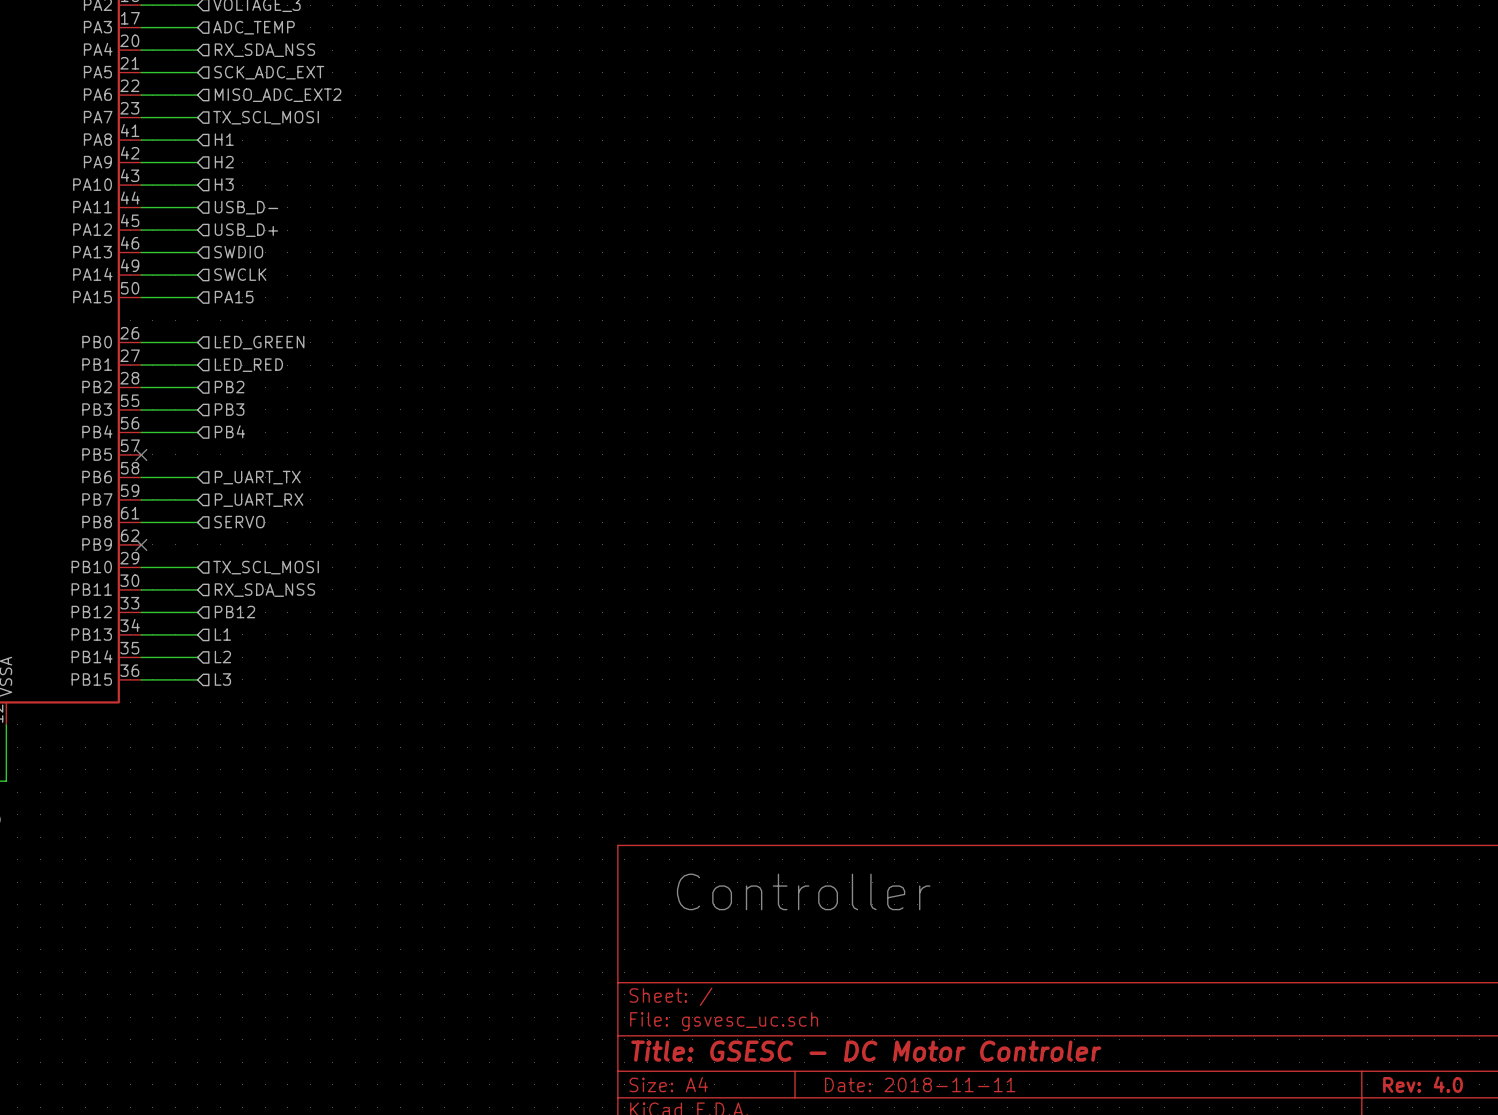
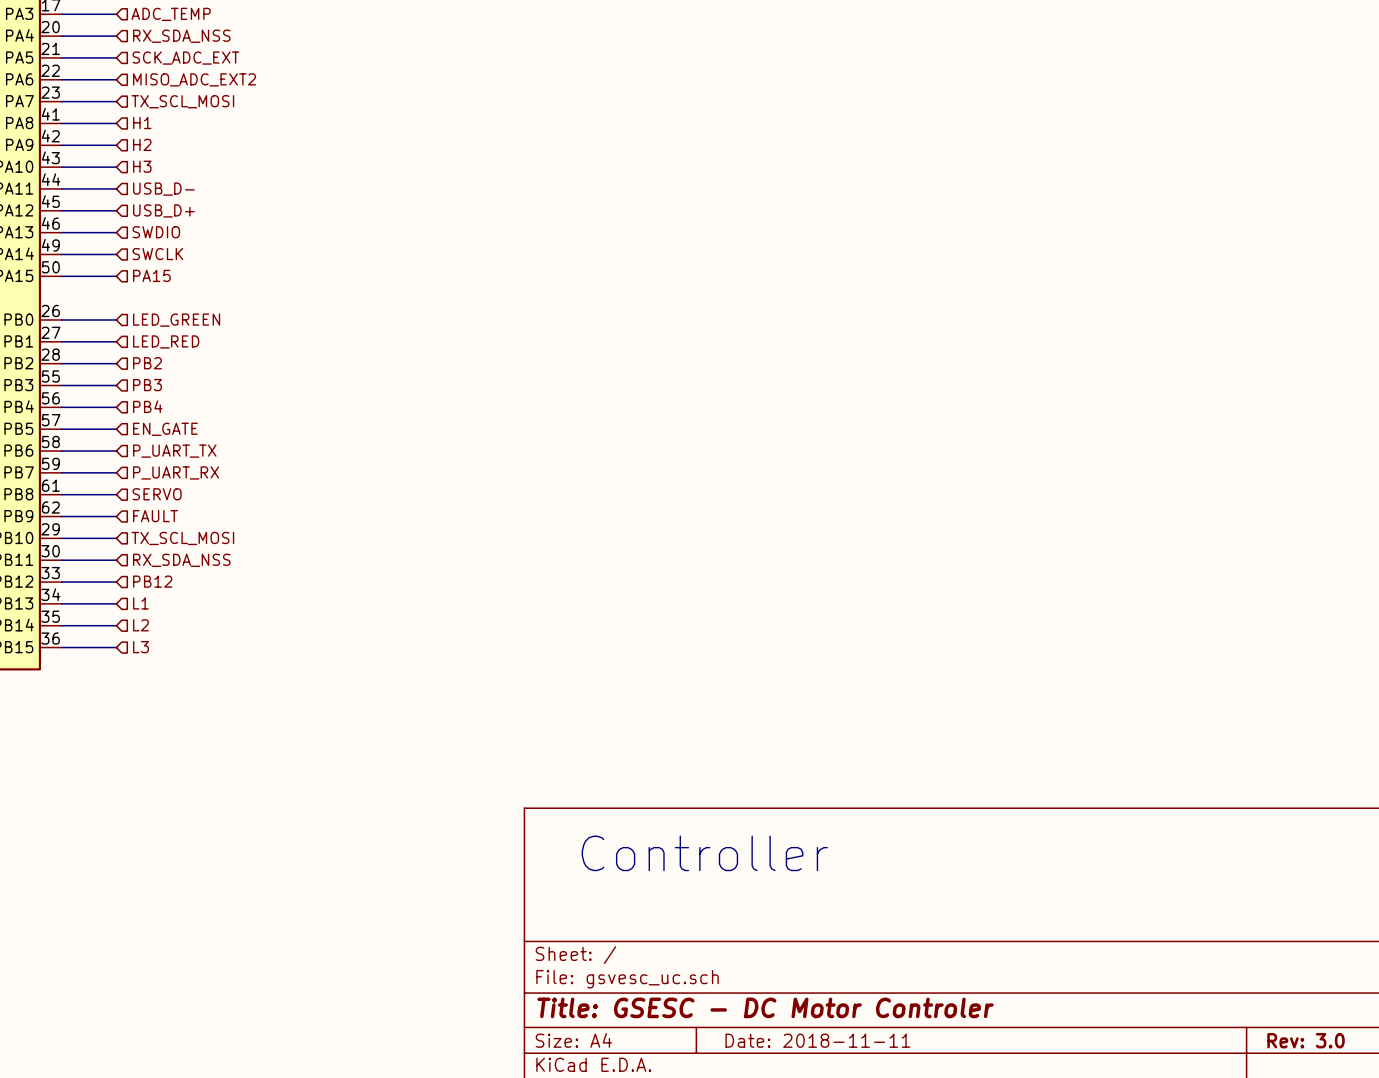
wire: none -> (61, 429) (116, 429)
no-connect mark: (141, 454) -> none
hierarchical label: none -> EN_GATE (165, 429)
wire: none -> (61, 516) (116, 516)
no-connect mark: (141, 544) -> none
hierarchical label: none -> FAULT (155, 516)
title block: Rev: 4.0 (1423, 1084) -> Rev: 3.0 (1306, 1040)

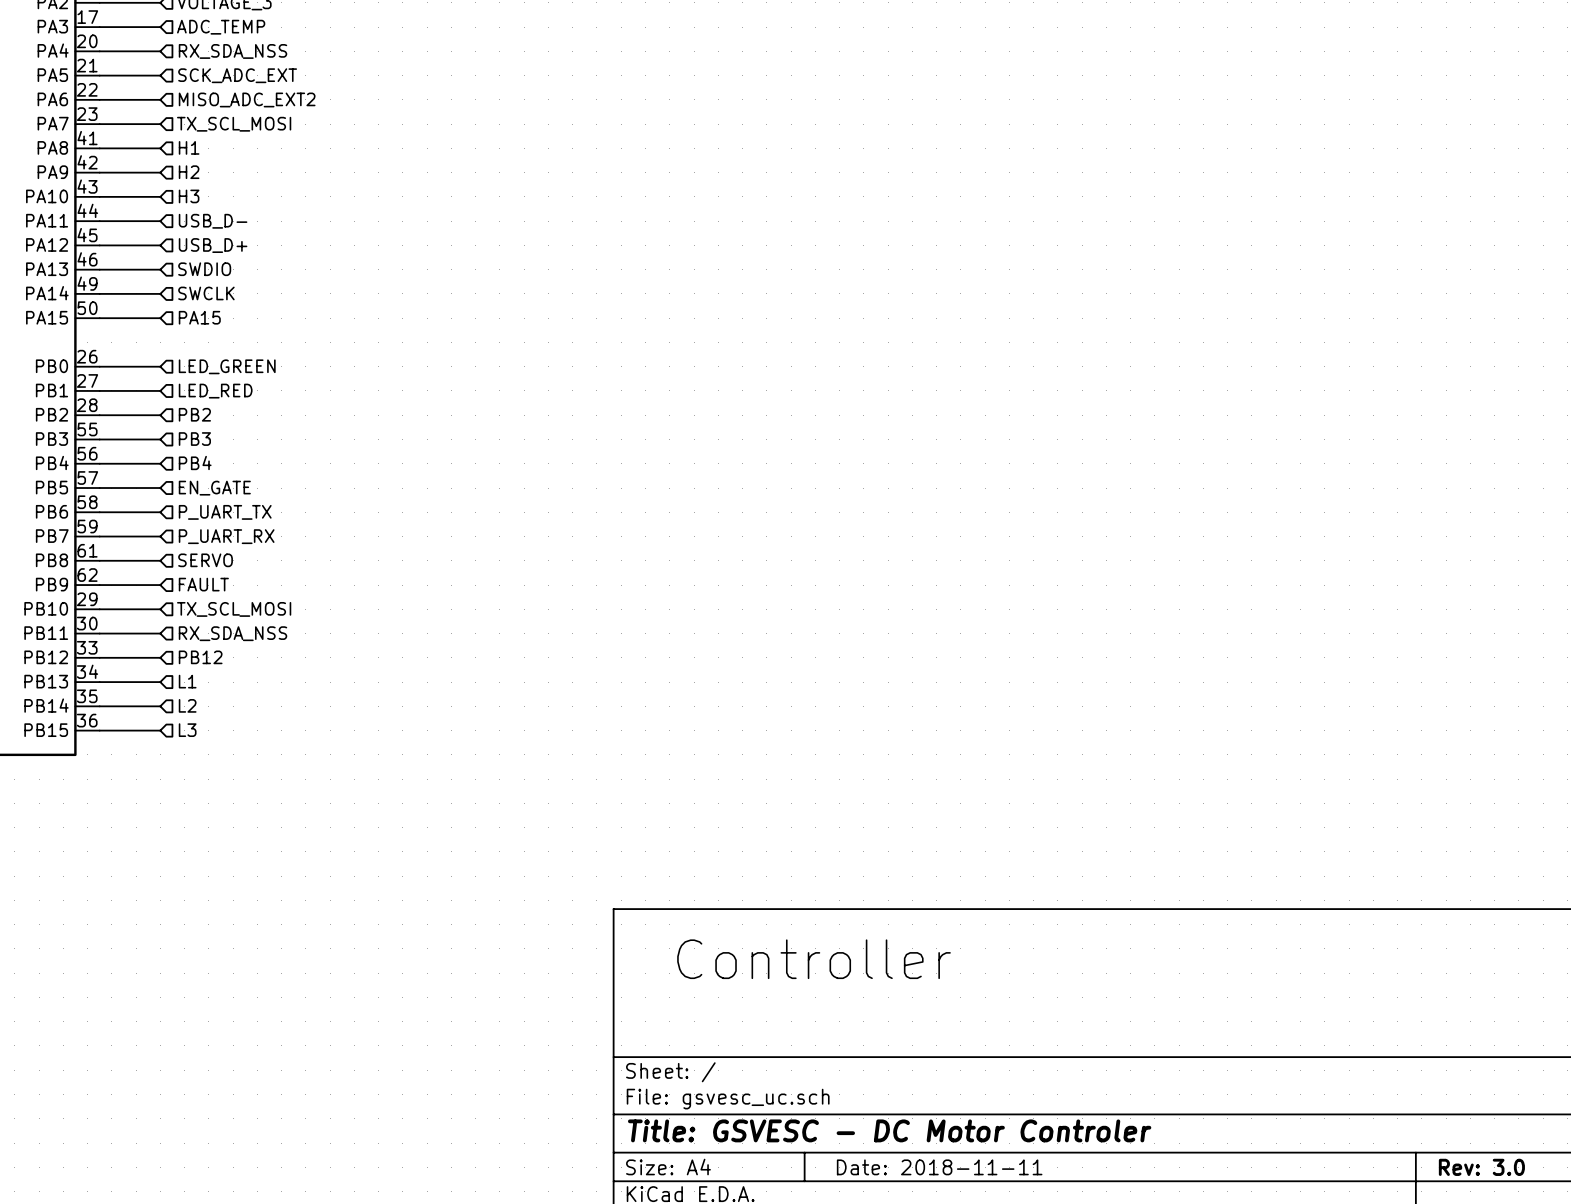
title block: Title: GSESC - DC Motor Controler (765, 1007) -> Title: GSVESC - DC Motor Controler (889, 1130)

